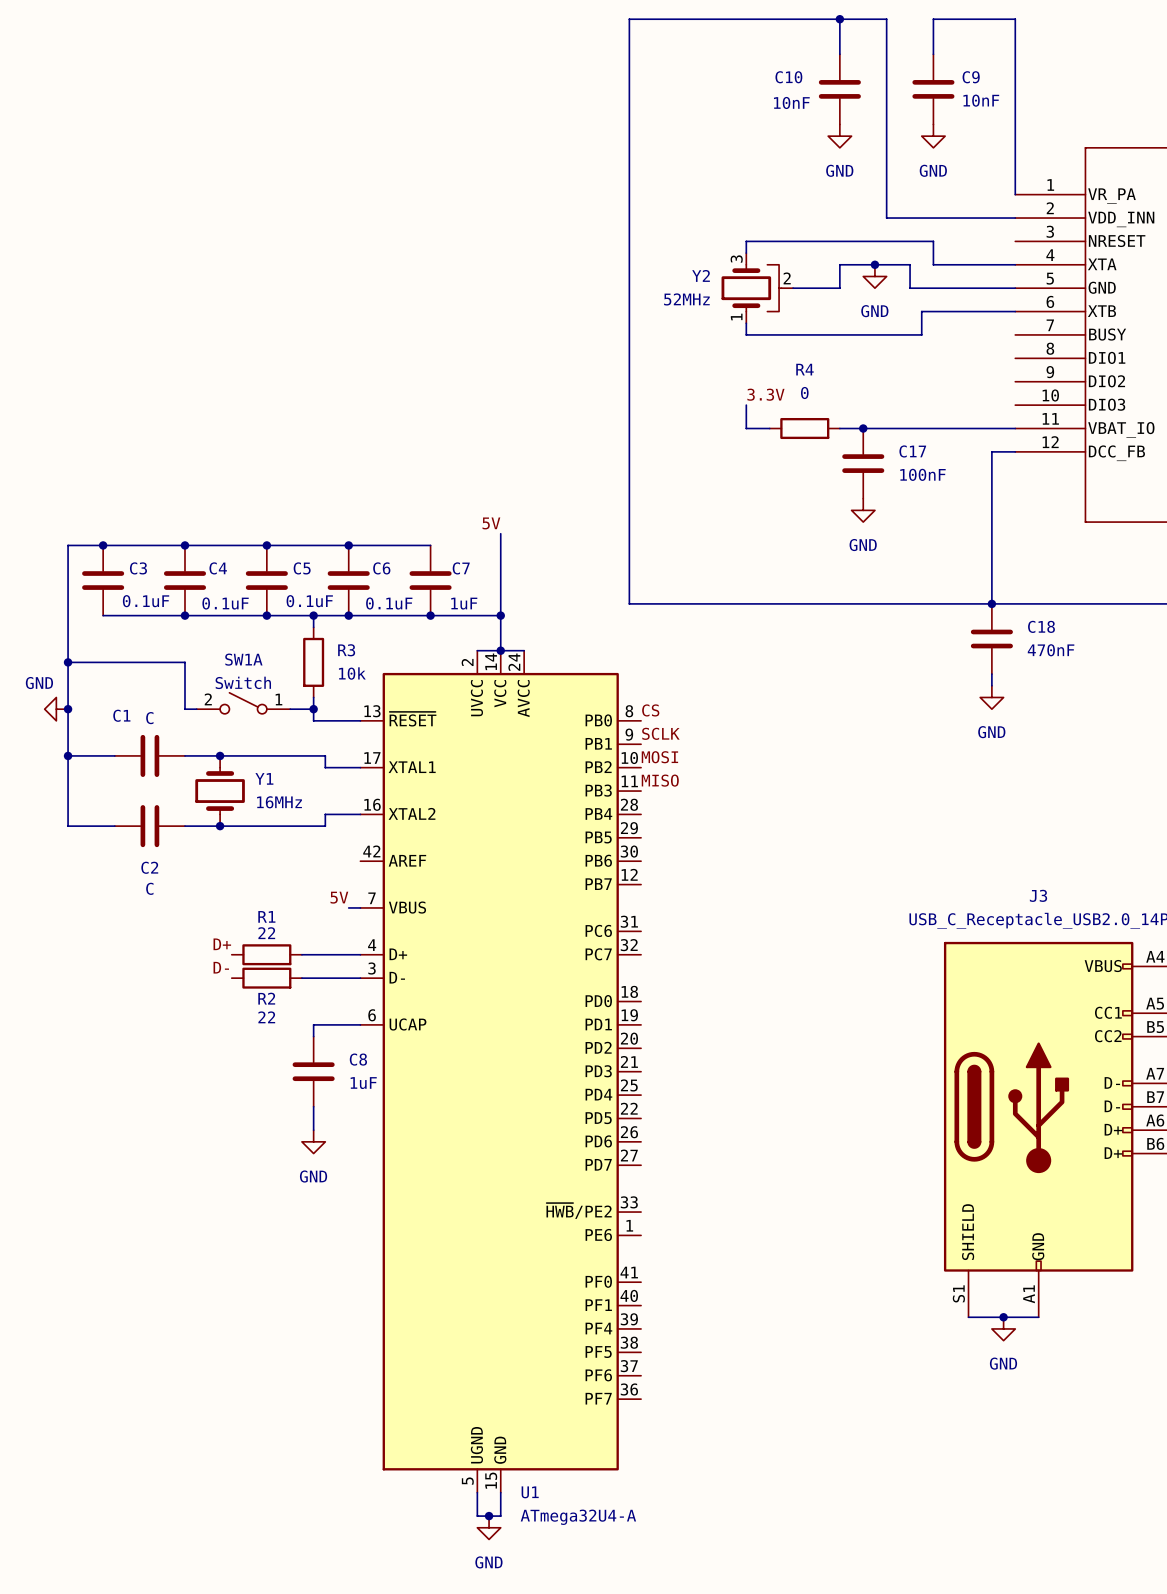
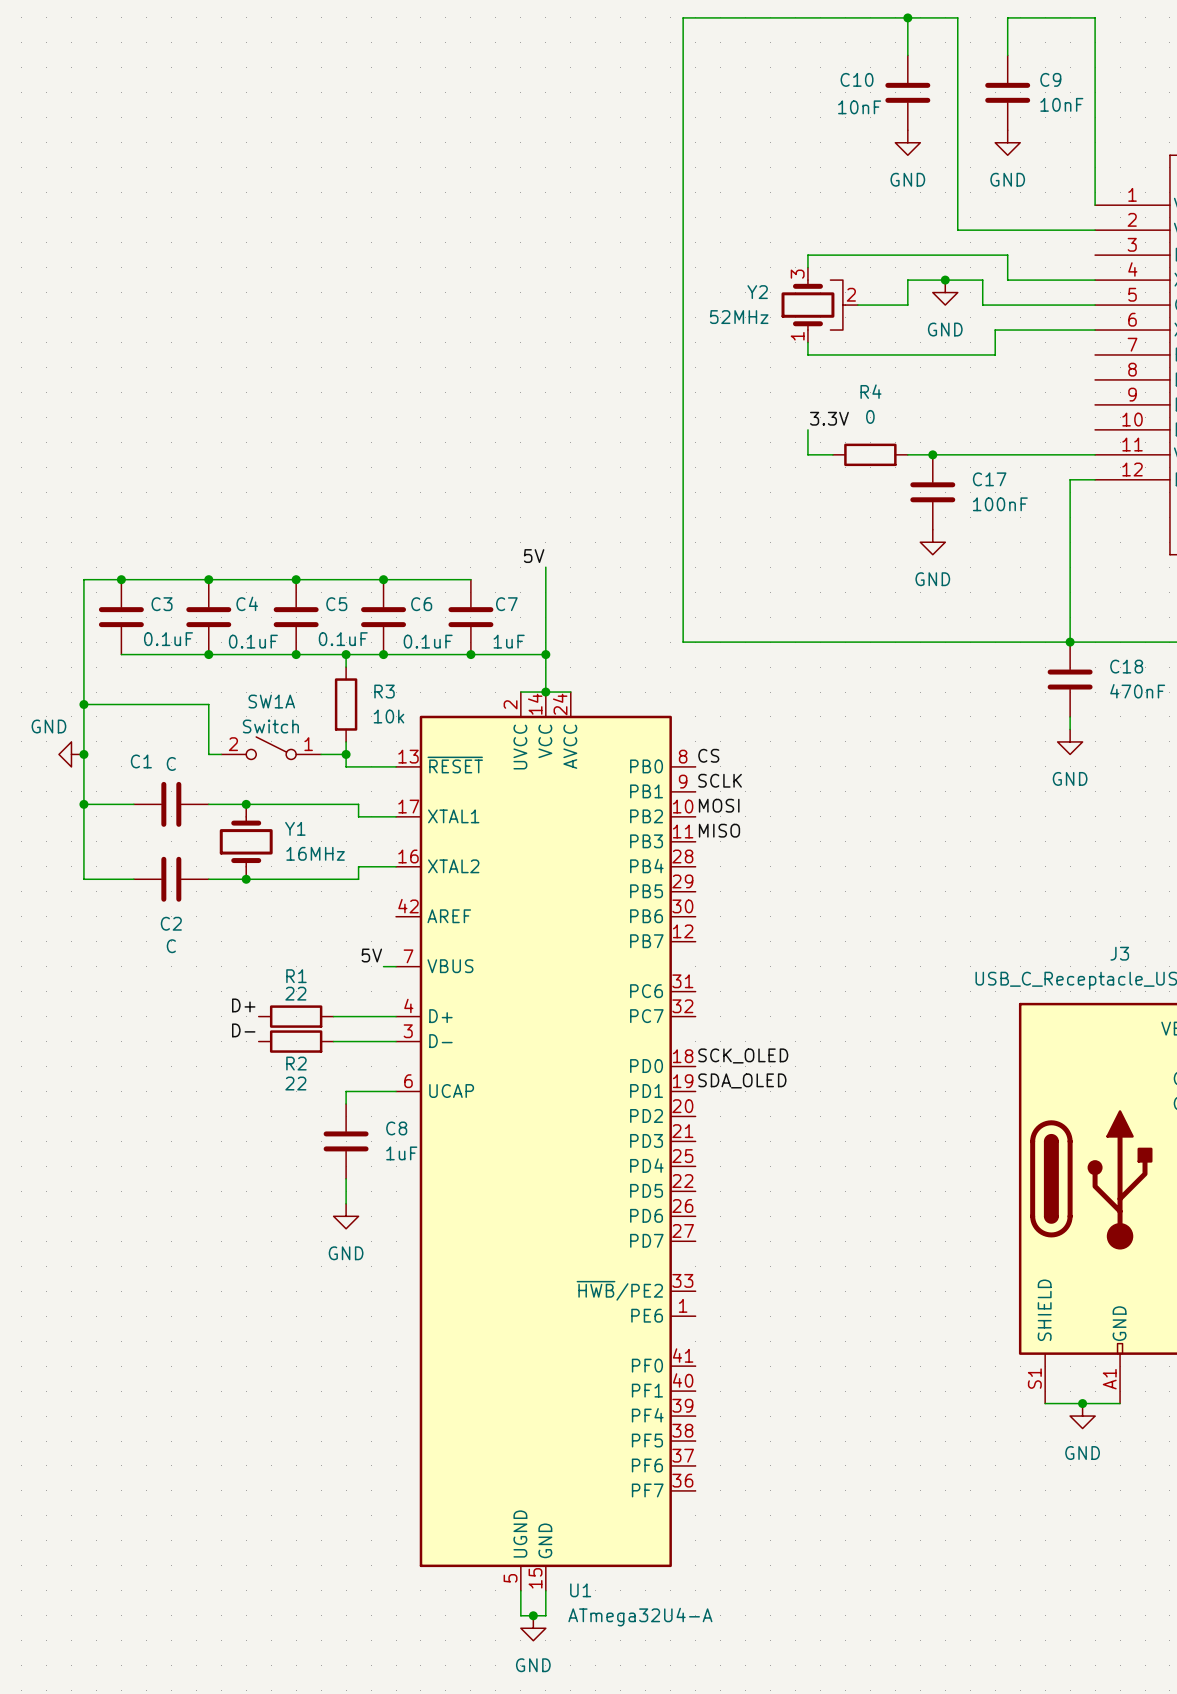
label: none -> SCK_OLED (743, 1055)
label: none -> SDA_OLED (742, 1080)

